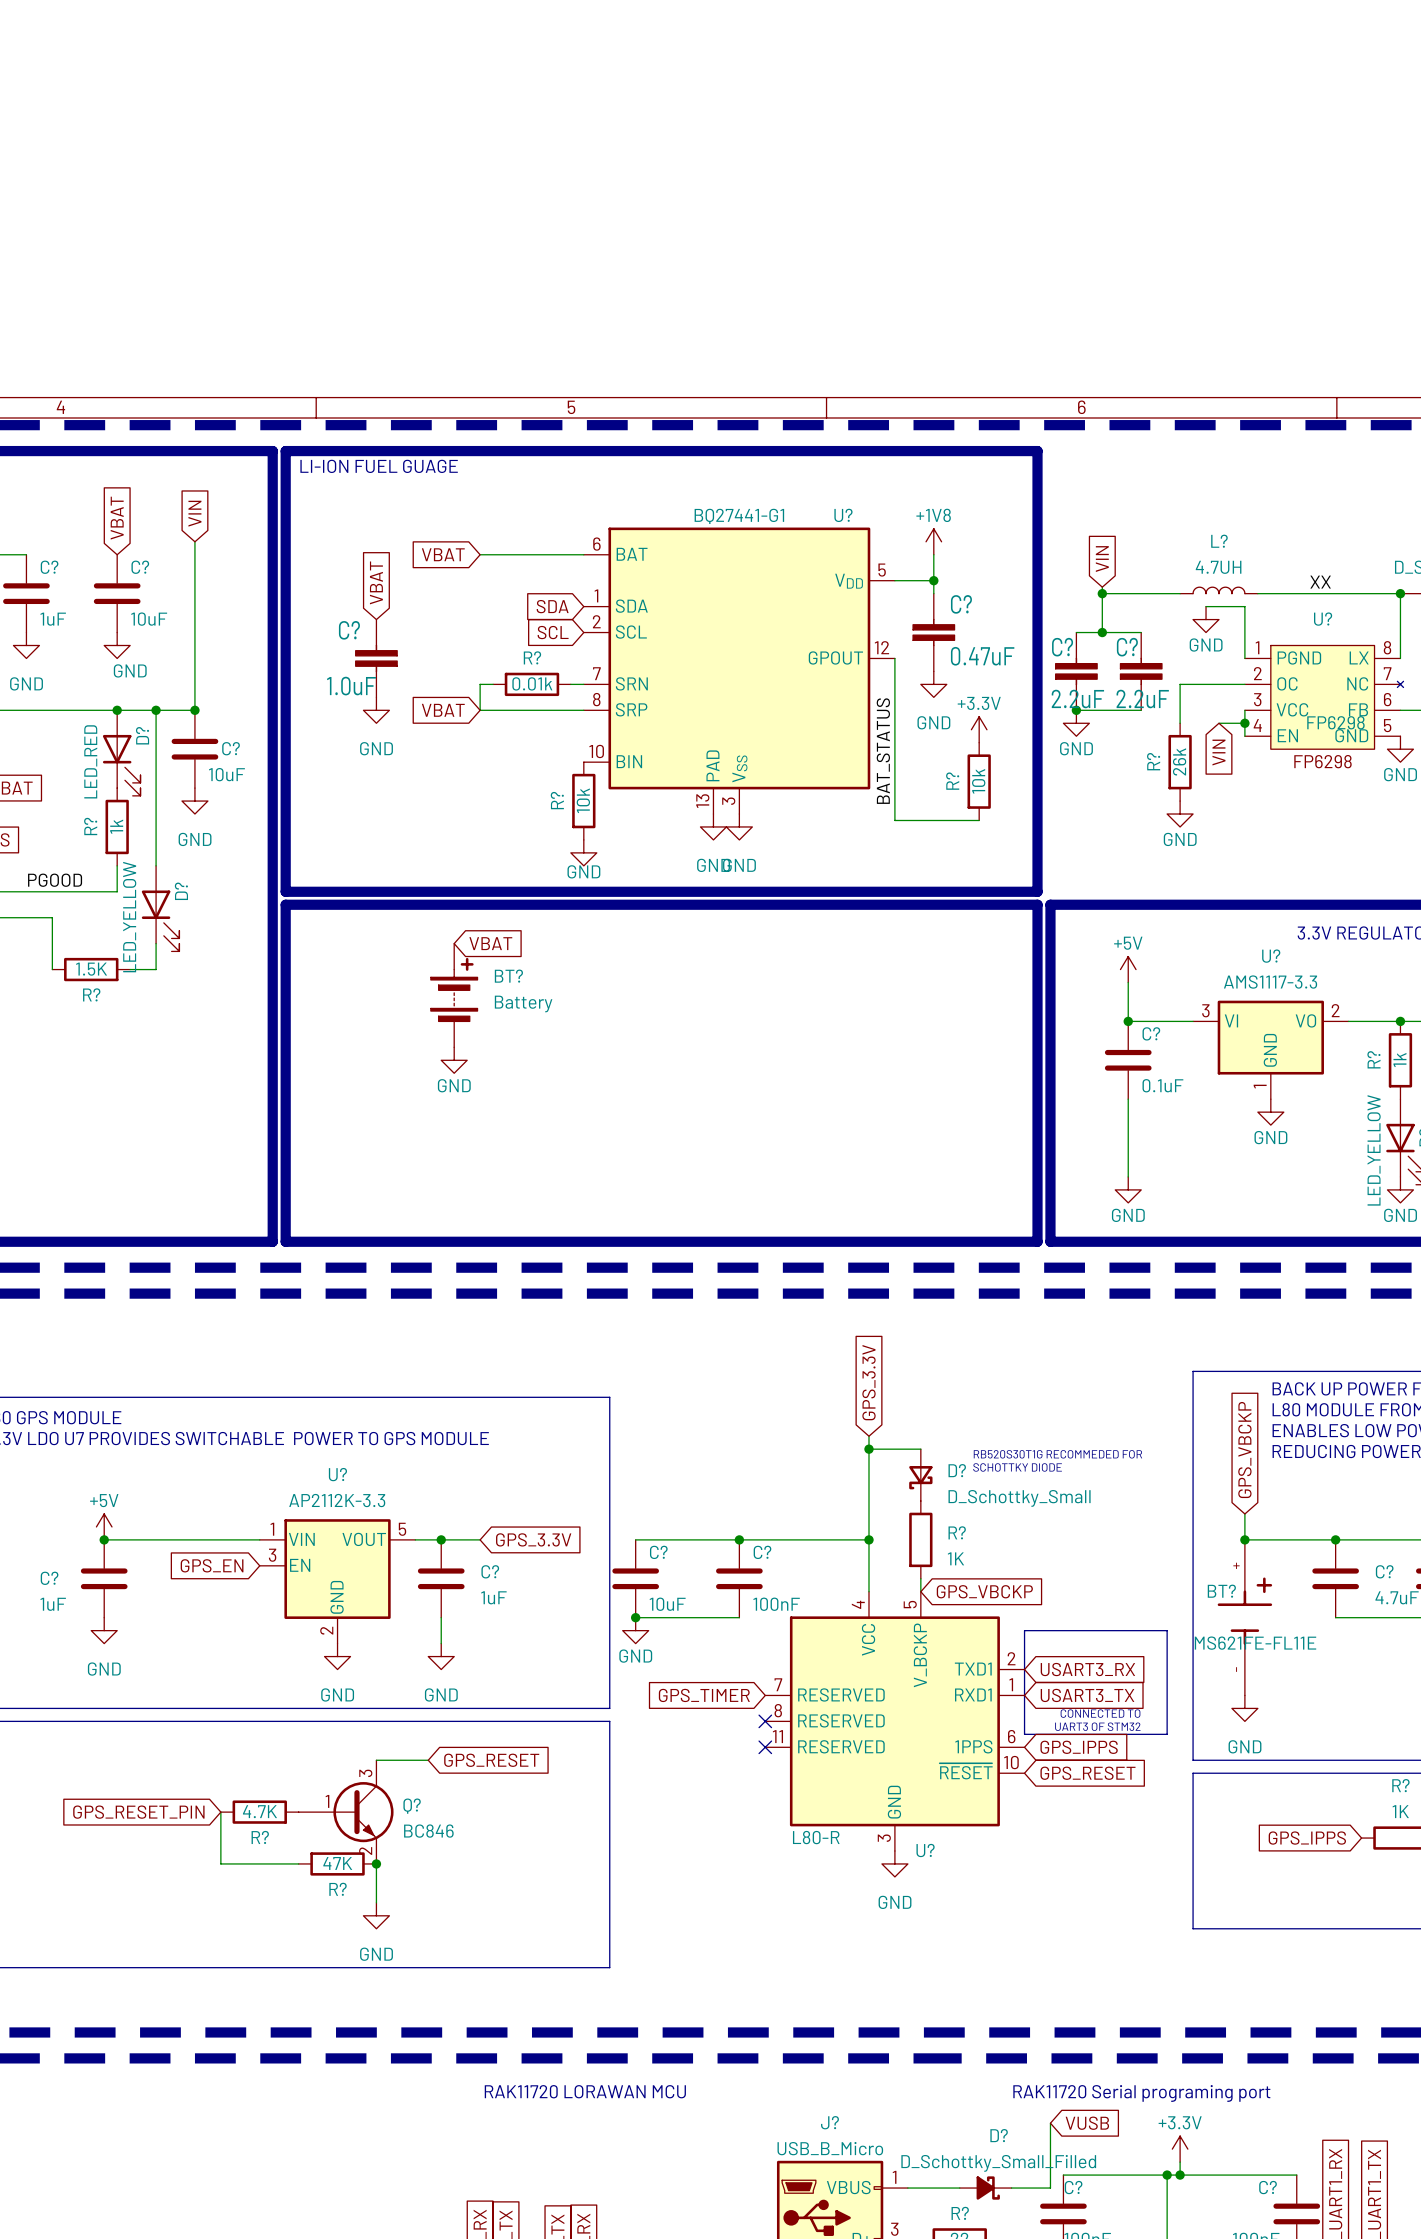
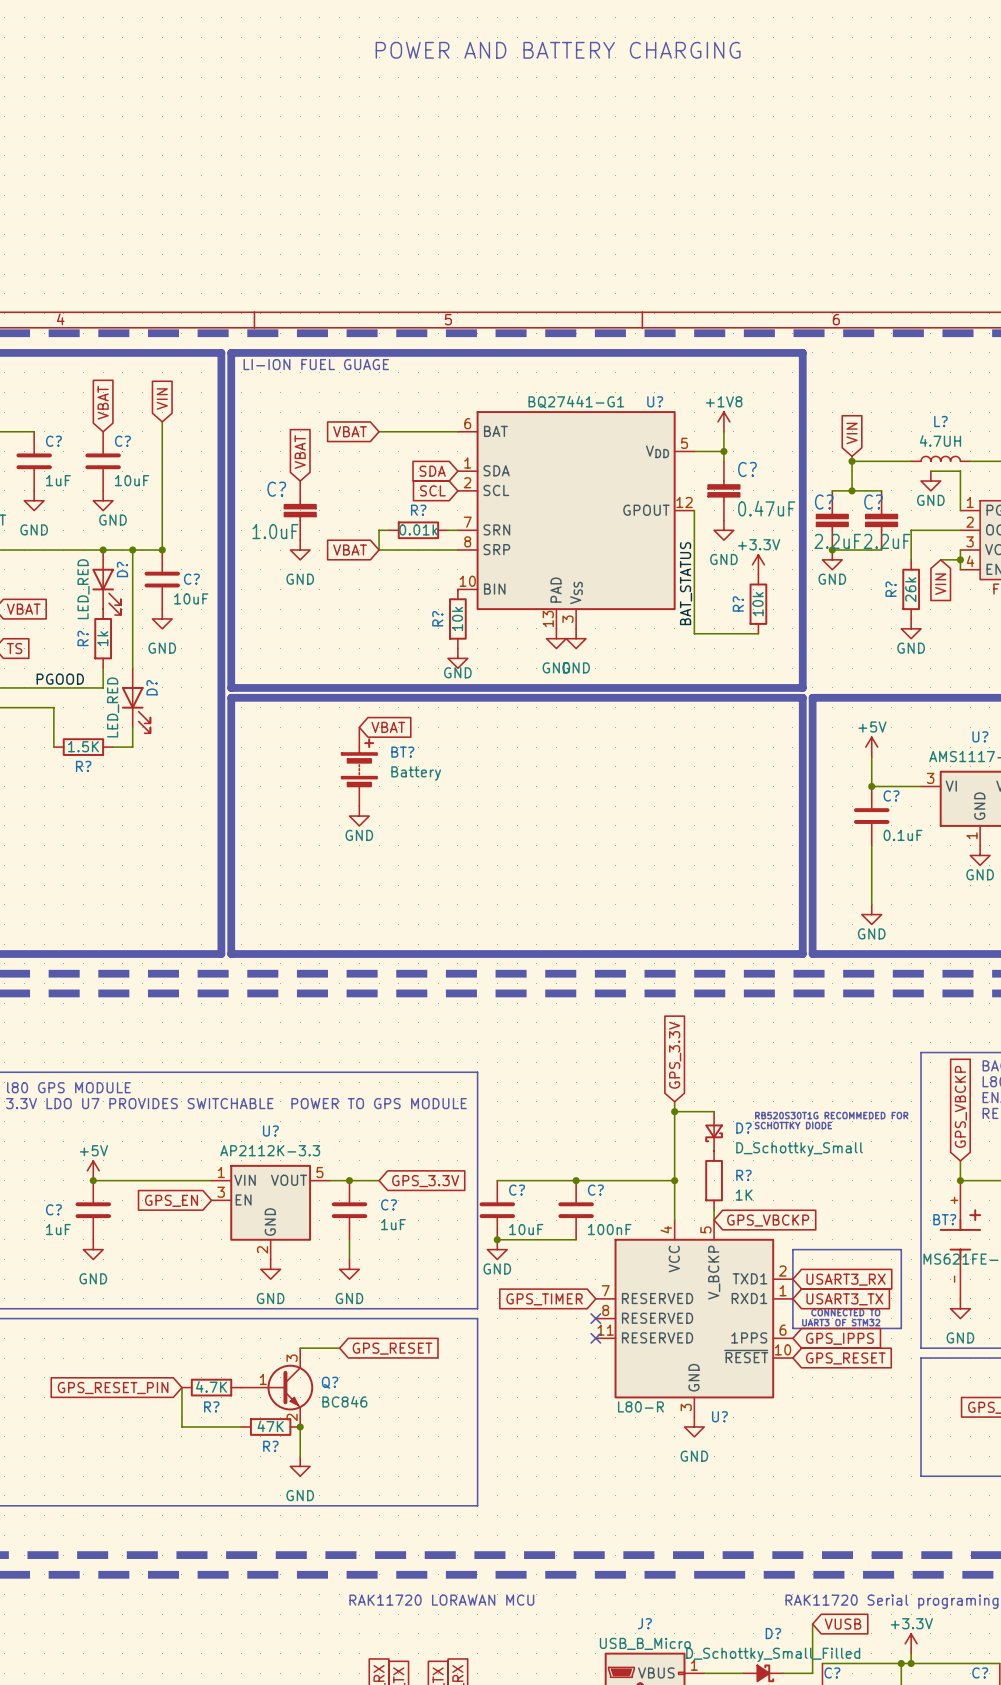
text: none -> POWER AND BATTERY CHARGING (558, 50)
D? value: LED_YELLOW (129, 917) -> LED_RED (113, 707)

